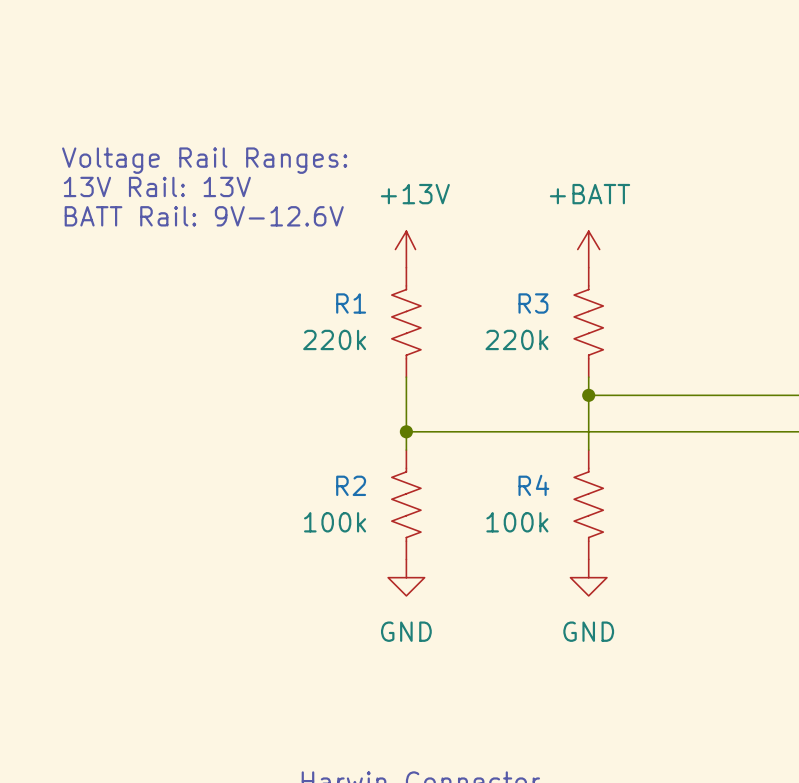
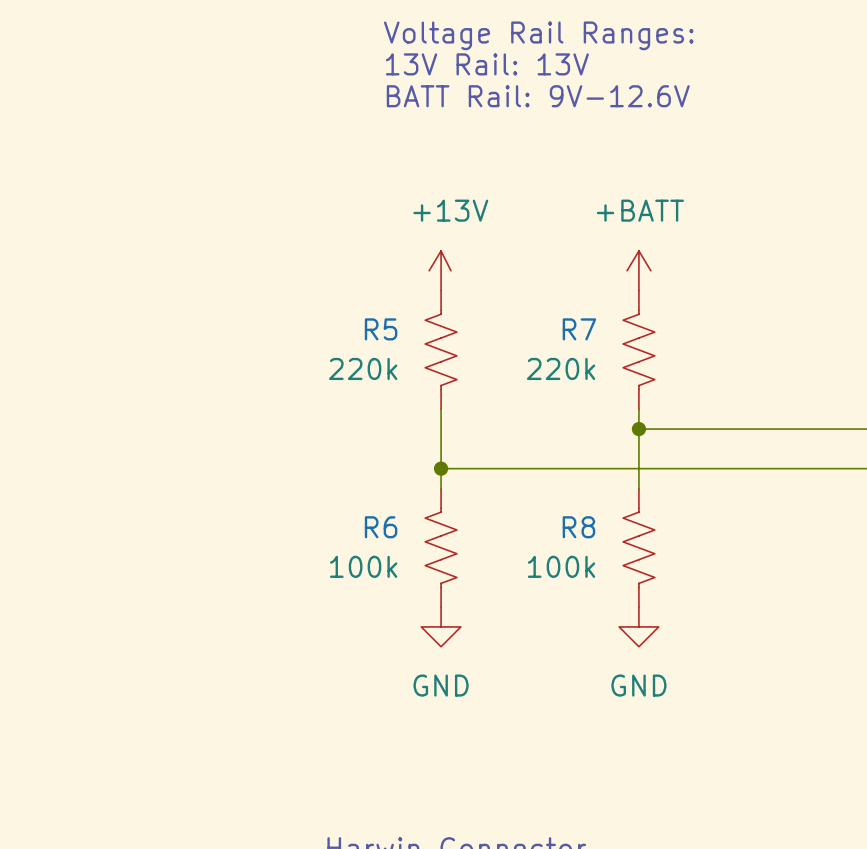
text position: Voltage Rail Ranges: (204, 160) -> Voltage Rail Ranges: (538, 35)
text position: 13V Rail: 13V (157, 186) -> 13V Rail: 13V (487, 64)
text position: BATT Rail: 9V-12.6V (204, 216) -> BATT Rail: 9V-12.6V (538, 96)
R1 name: R1 (351, 303) -> R5 (381, 329)
R3 name: R3 (533, 303) -> R7 (579, 329)
R2 name: R2 (351, 485) -> R6 (381, 527)
R4 name: R4 (533, 485) -> R8 (578, 527)

